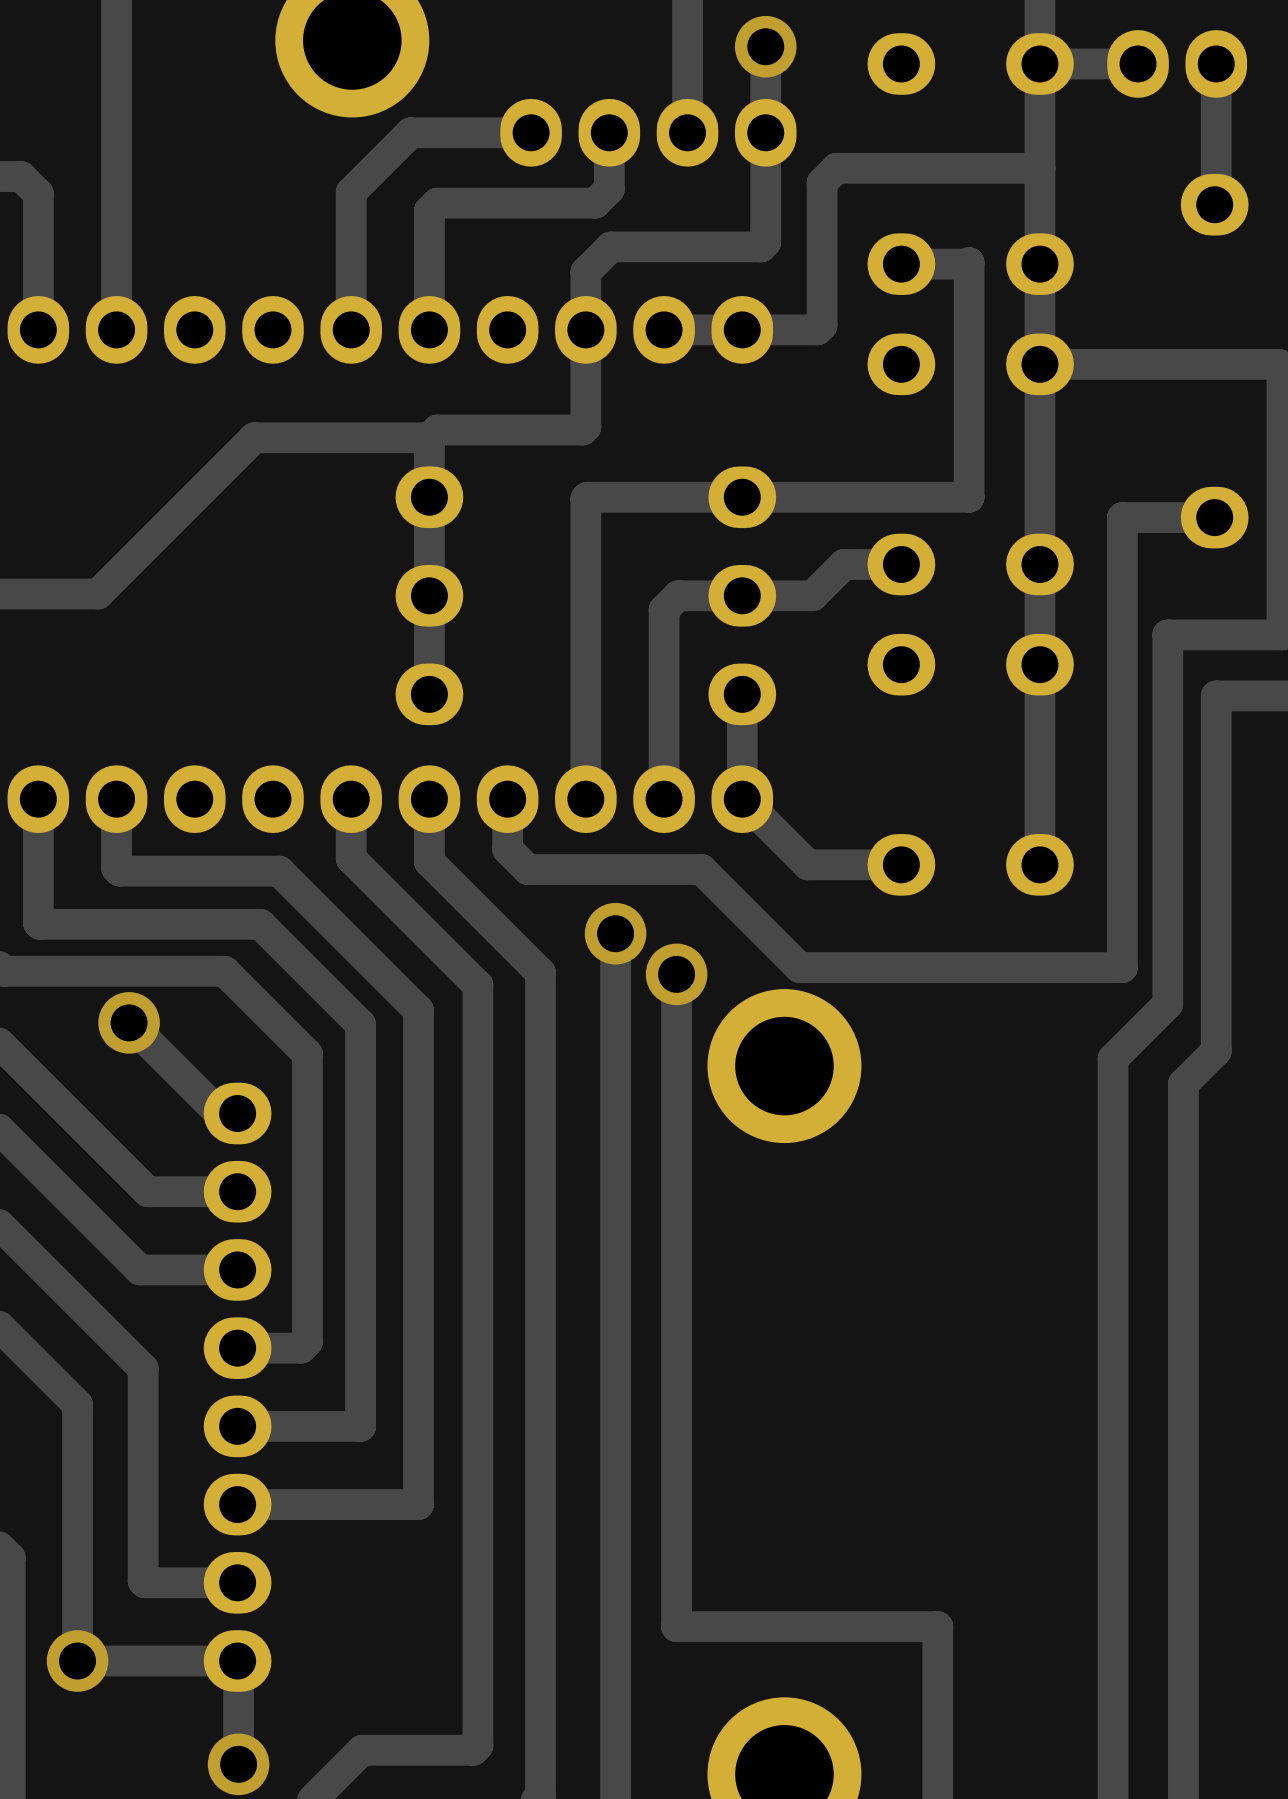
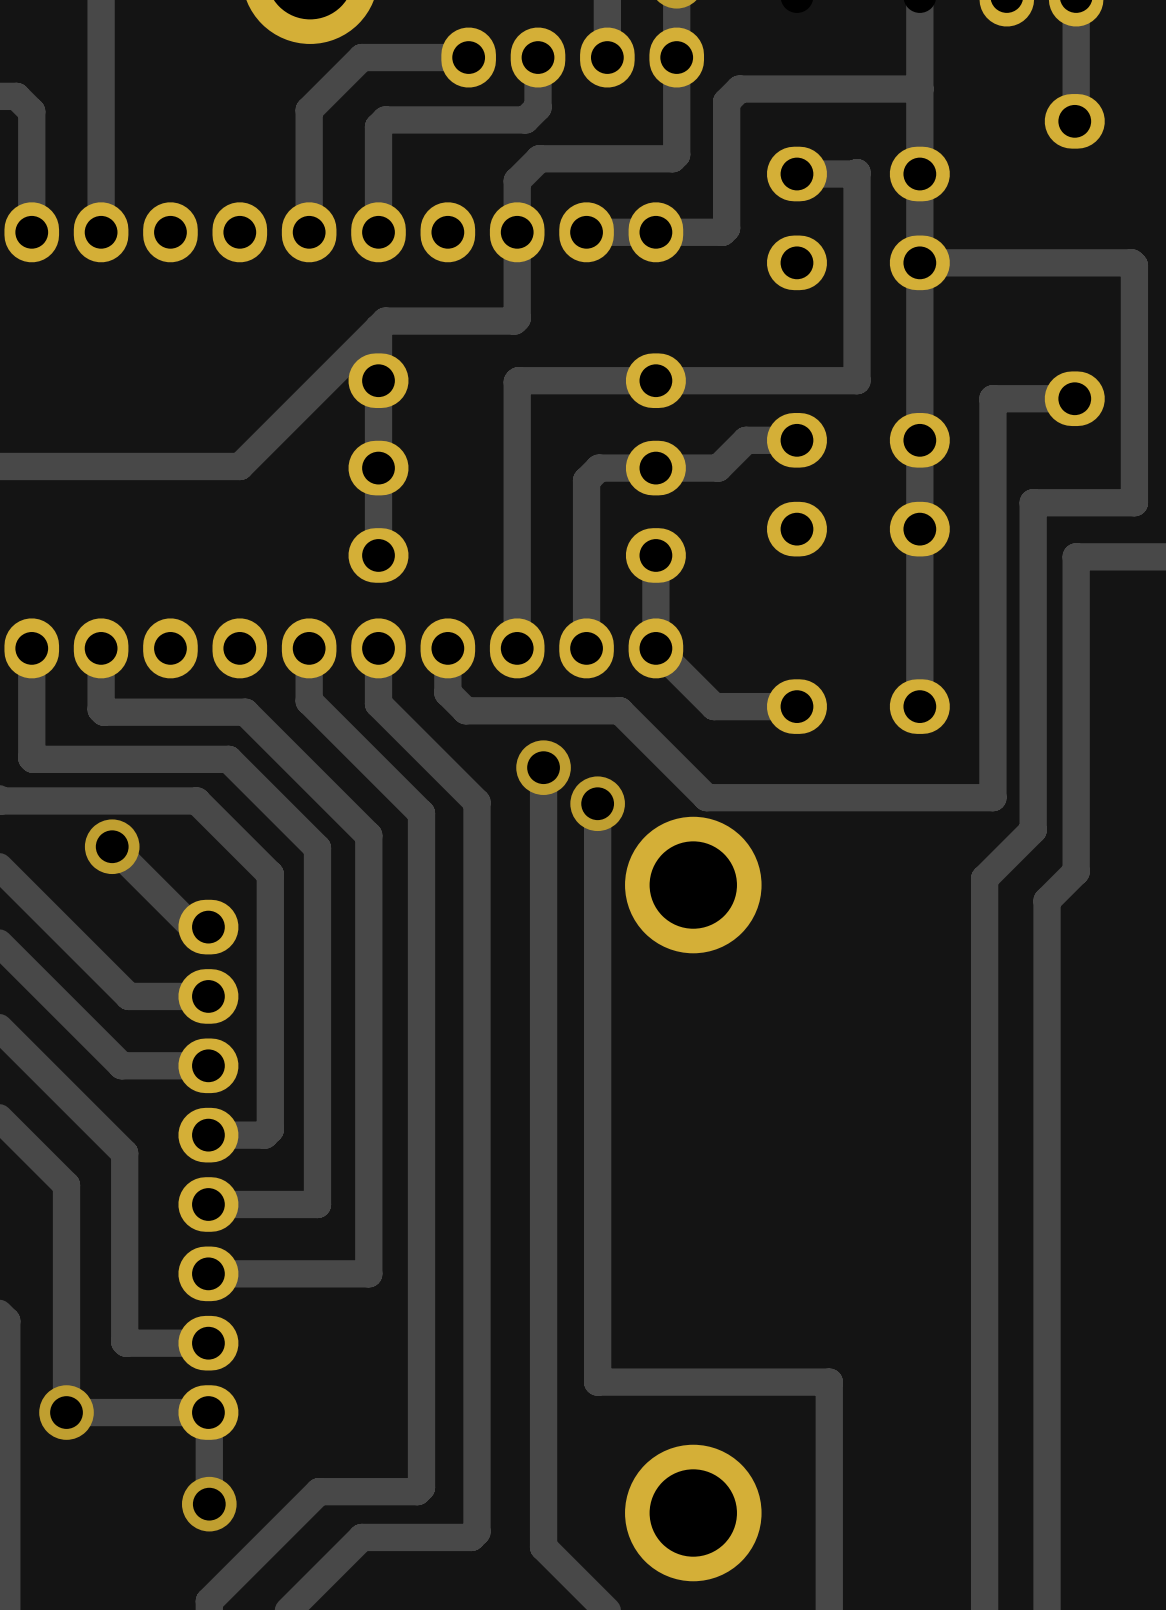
track: (429, 437) (254, 437) (98, 594) -> (378, 328) (240, 466) (84, 466)

